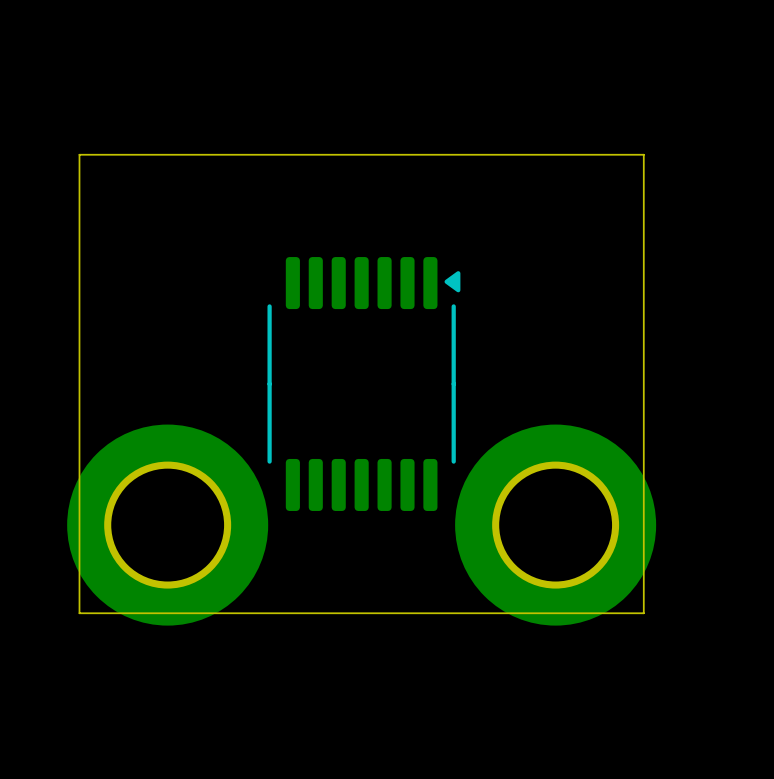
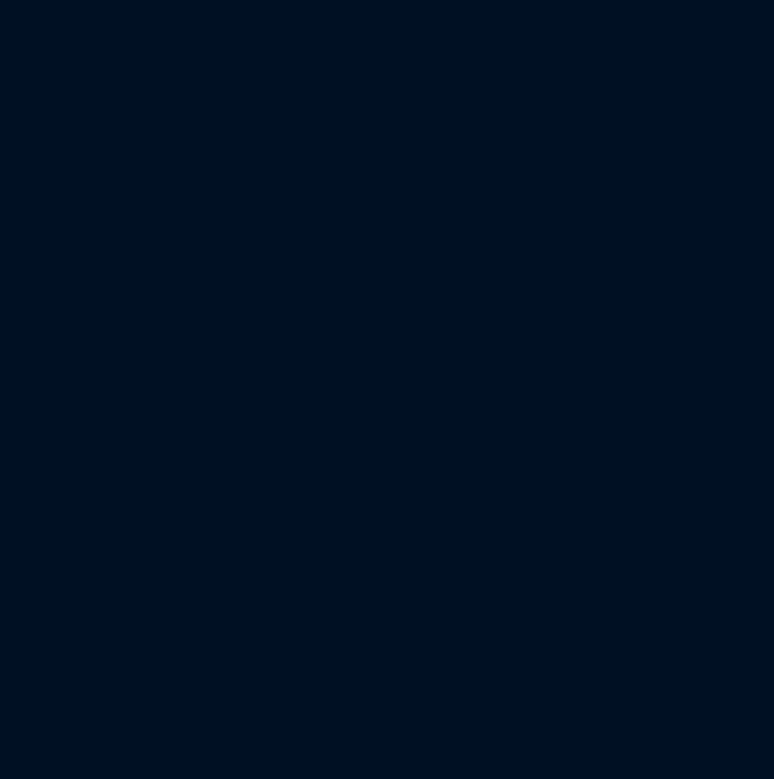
board edge: (643, 154) (79, 154) (79, 613) (643, 613) (643, 154) -> none
part: (363, 384) -> none
part: (167, 525) -> none
part: (555, 525) -> none

